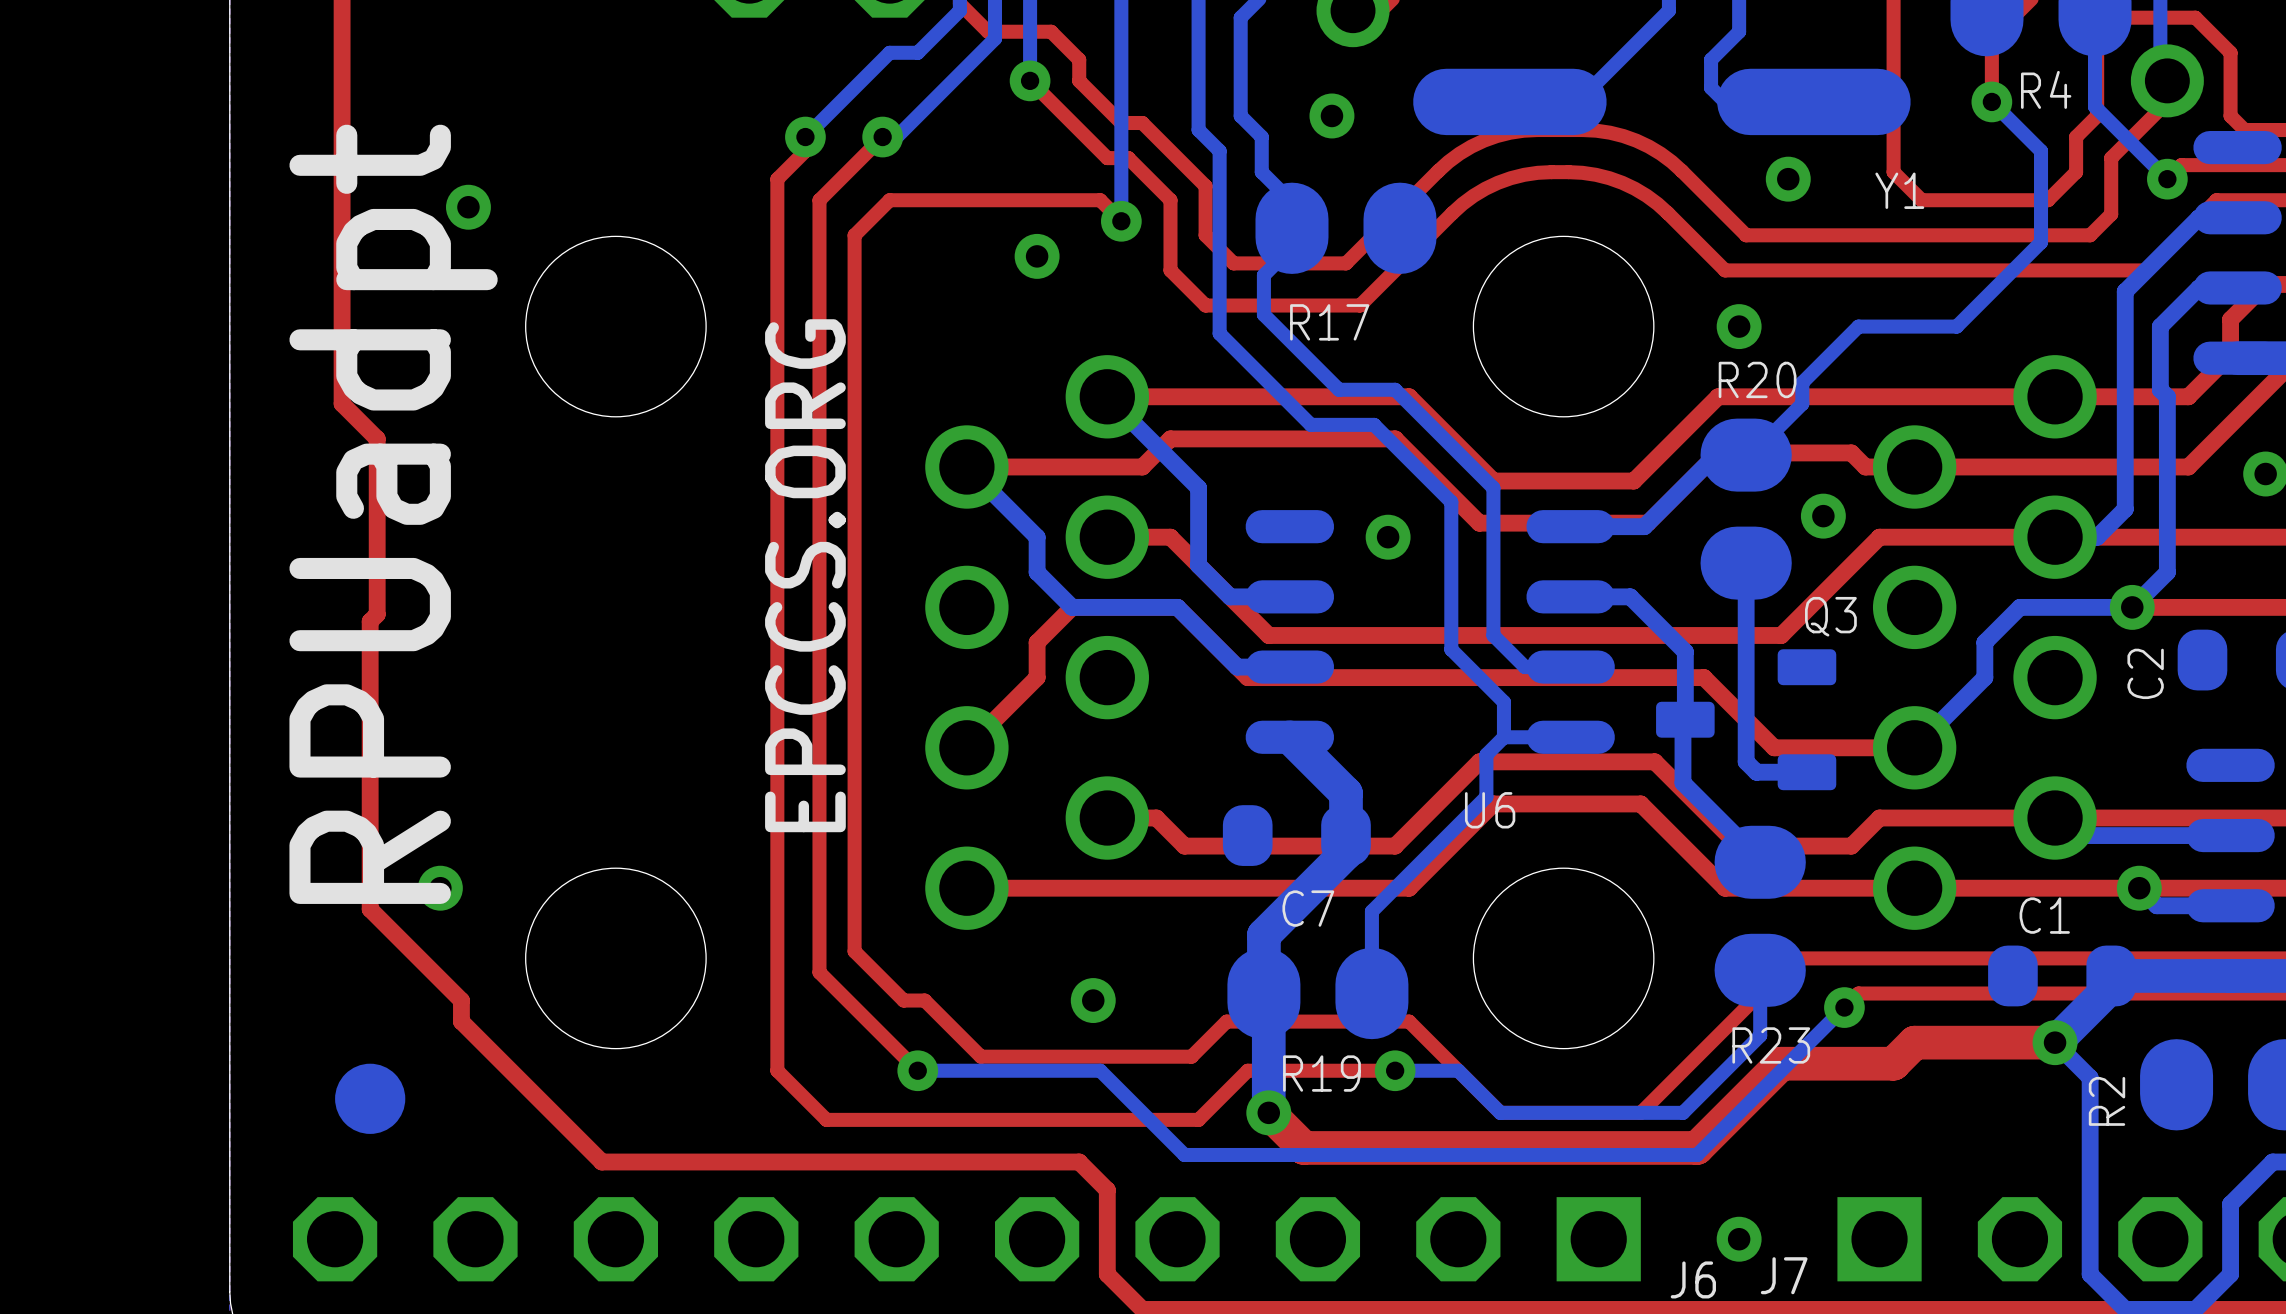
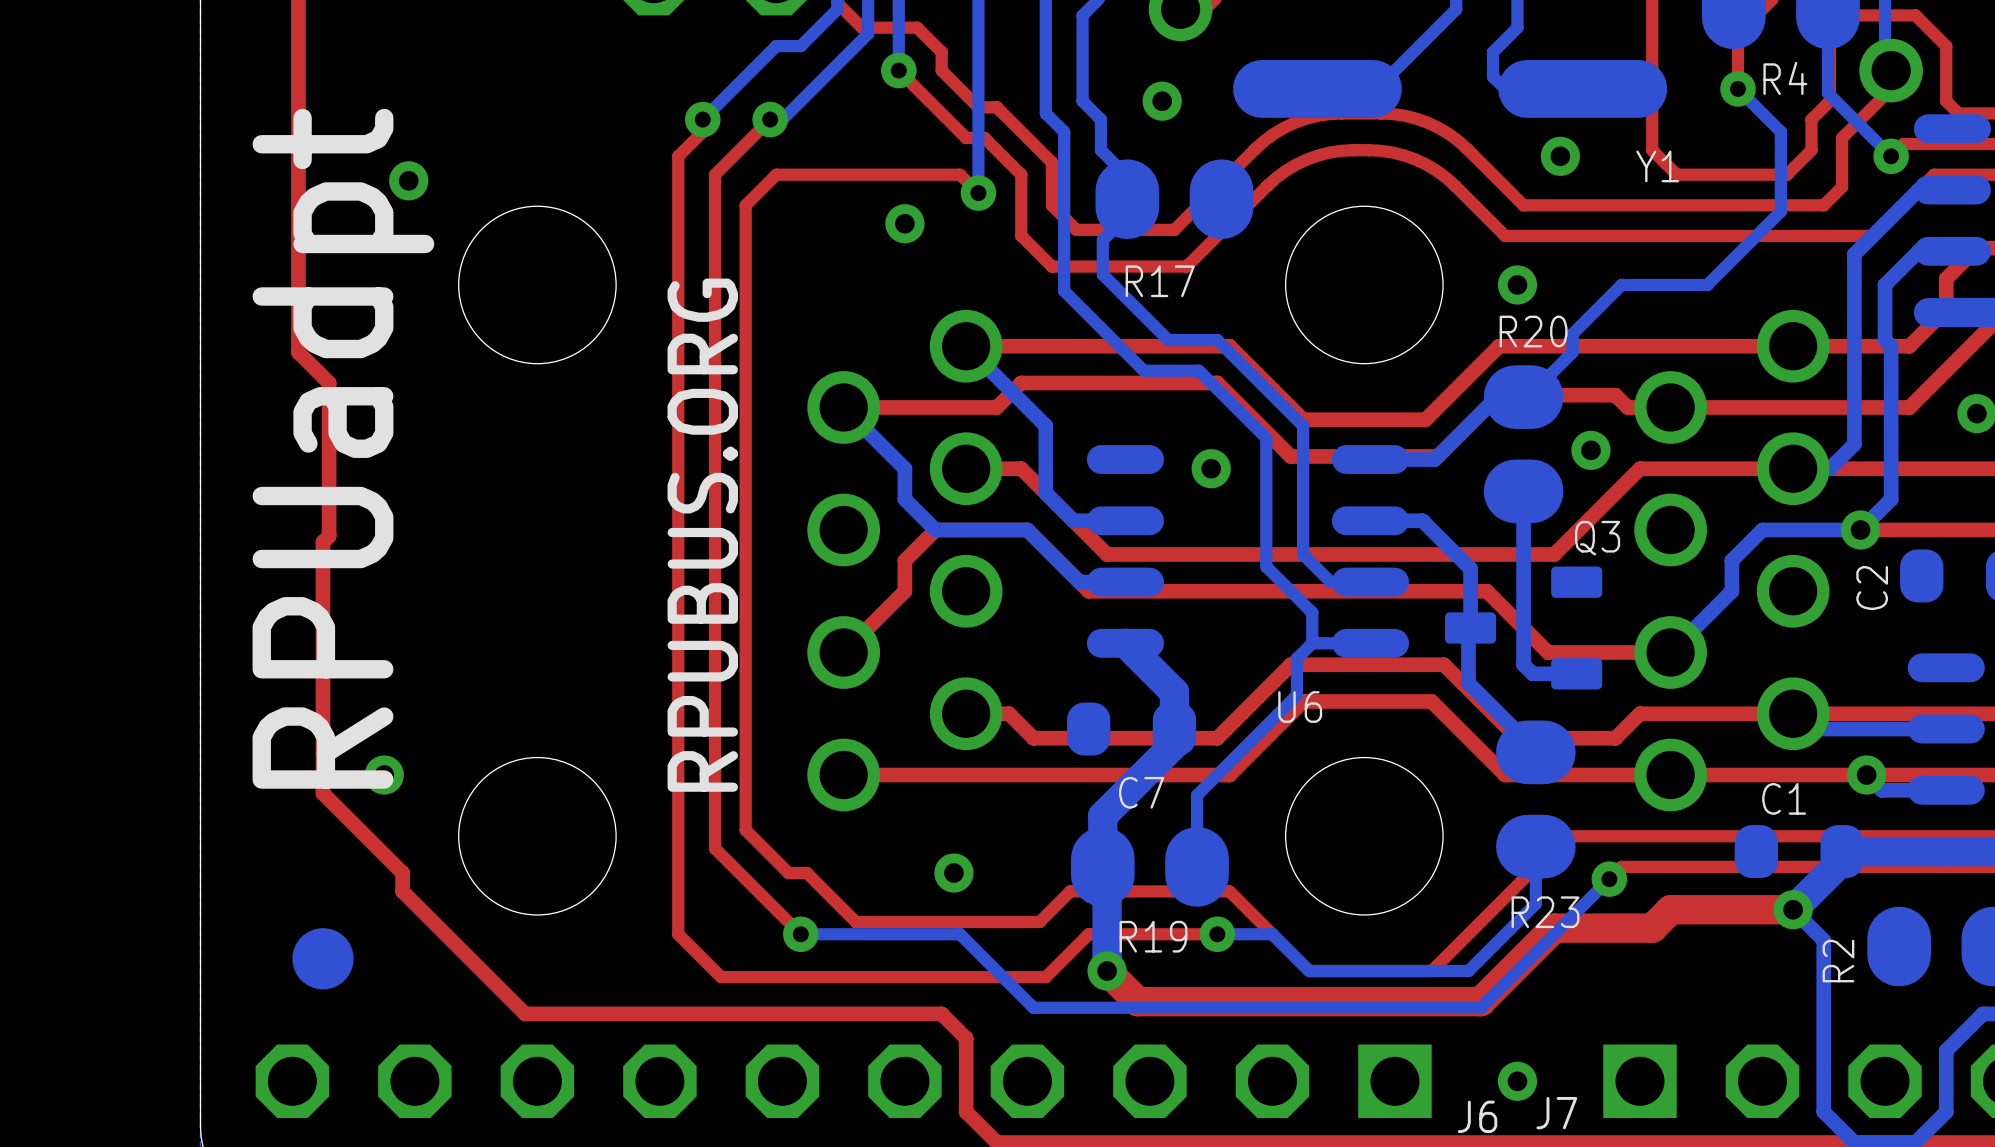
text: EPCCS.ORG (805, 575) -> RPUBUS.ORG (702, 535)

